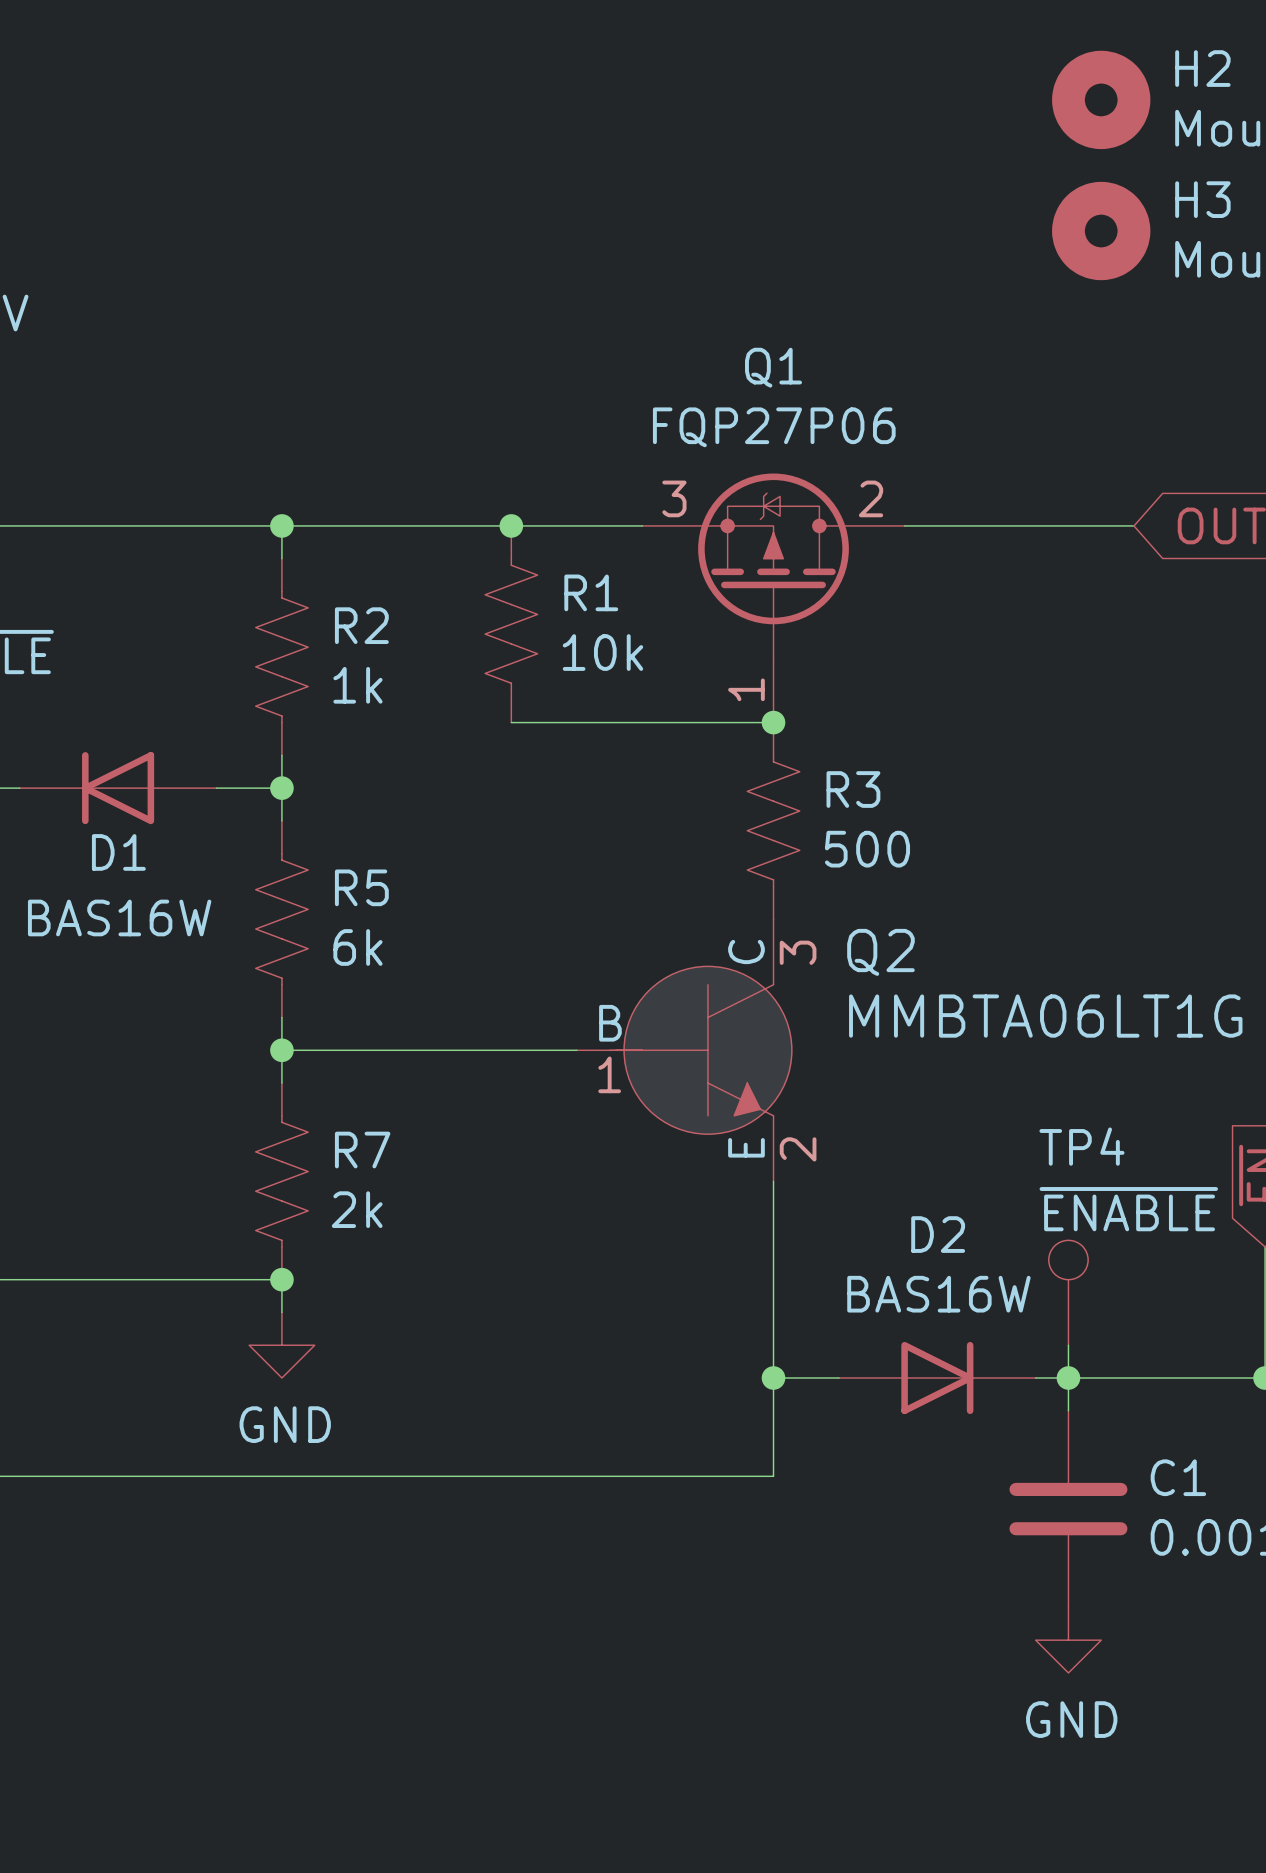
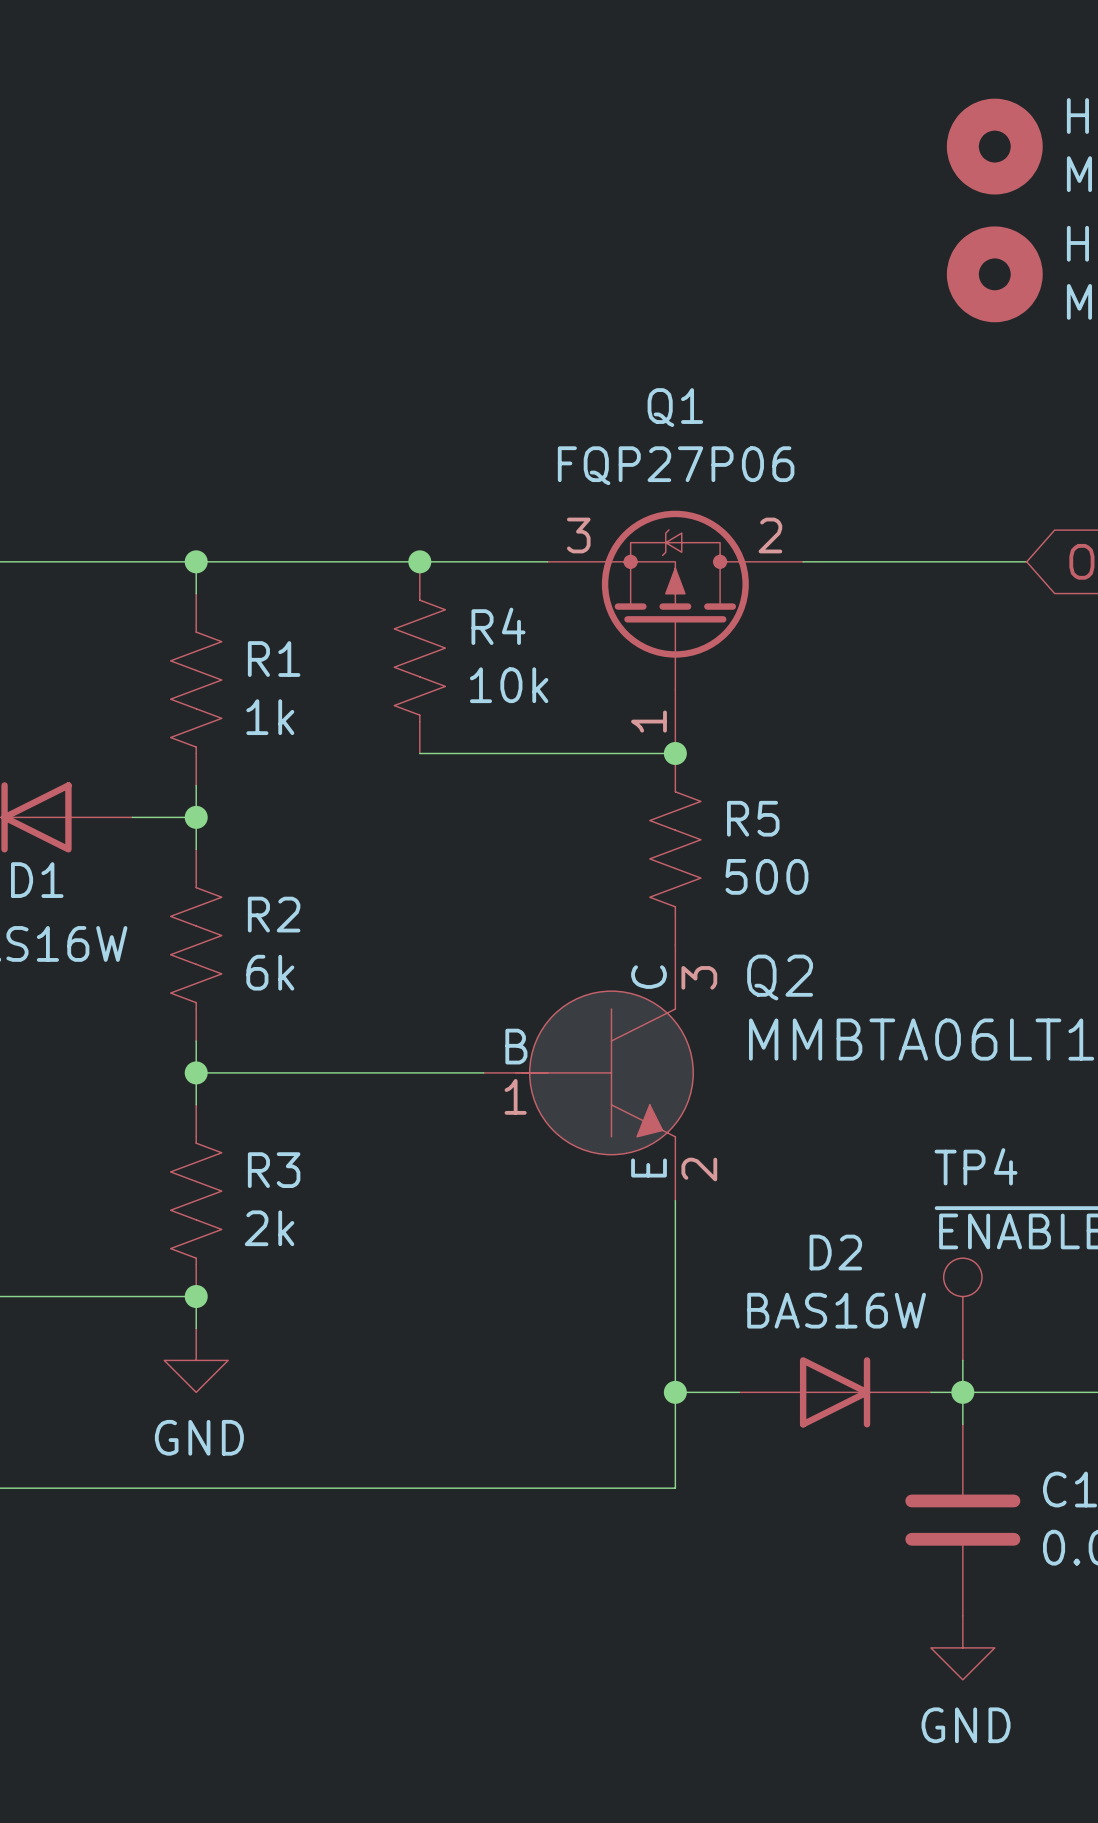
R1 name: R1 (591, 592) -> R4 (498, 626)
R2 name: R2 (361, 625) -> R1 (274, 659)
R3 name: R3 (853, 789) -> R5 (753, 818)
R5 name: R5 (361, 887) -> R2 (274, 914)
R7 name: R7 (362, 1150) -> R3 (274, 1170)

